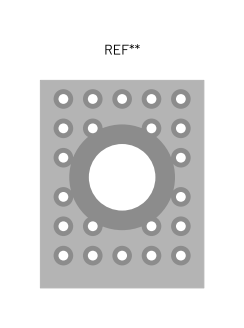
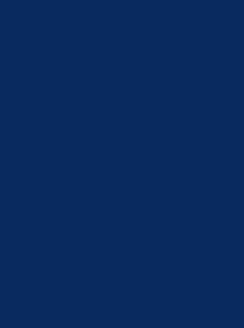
REF**: (122, 184) -> none

